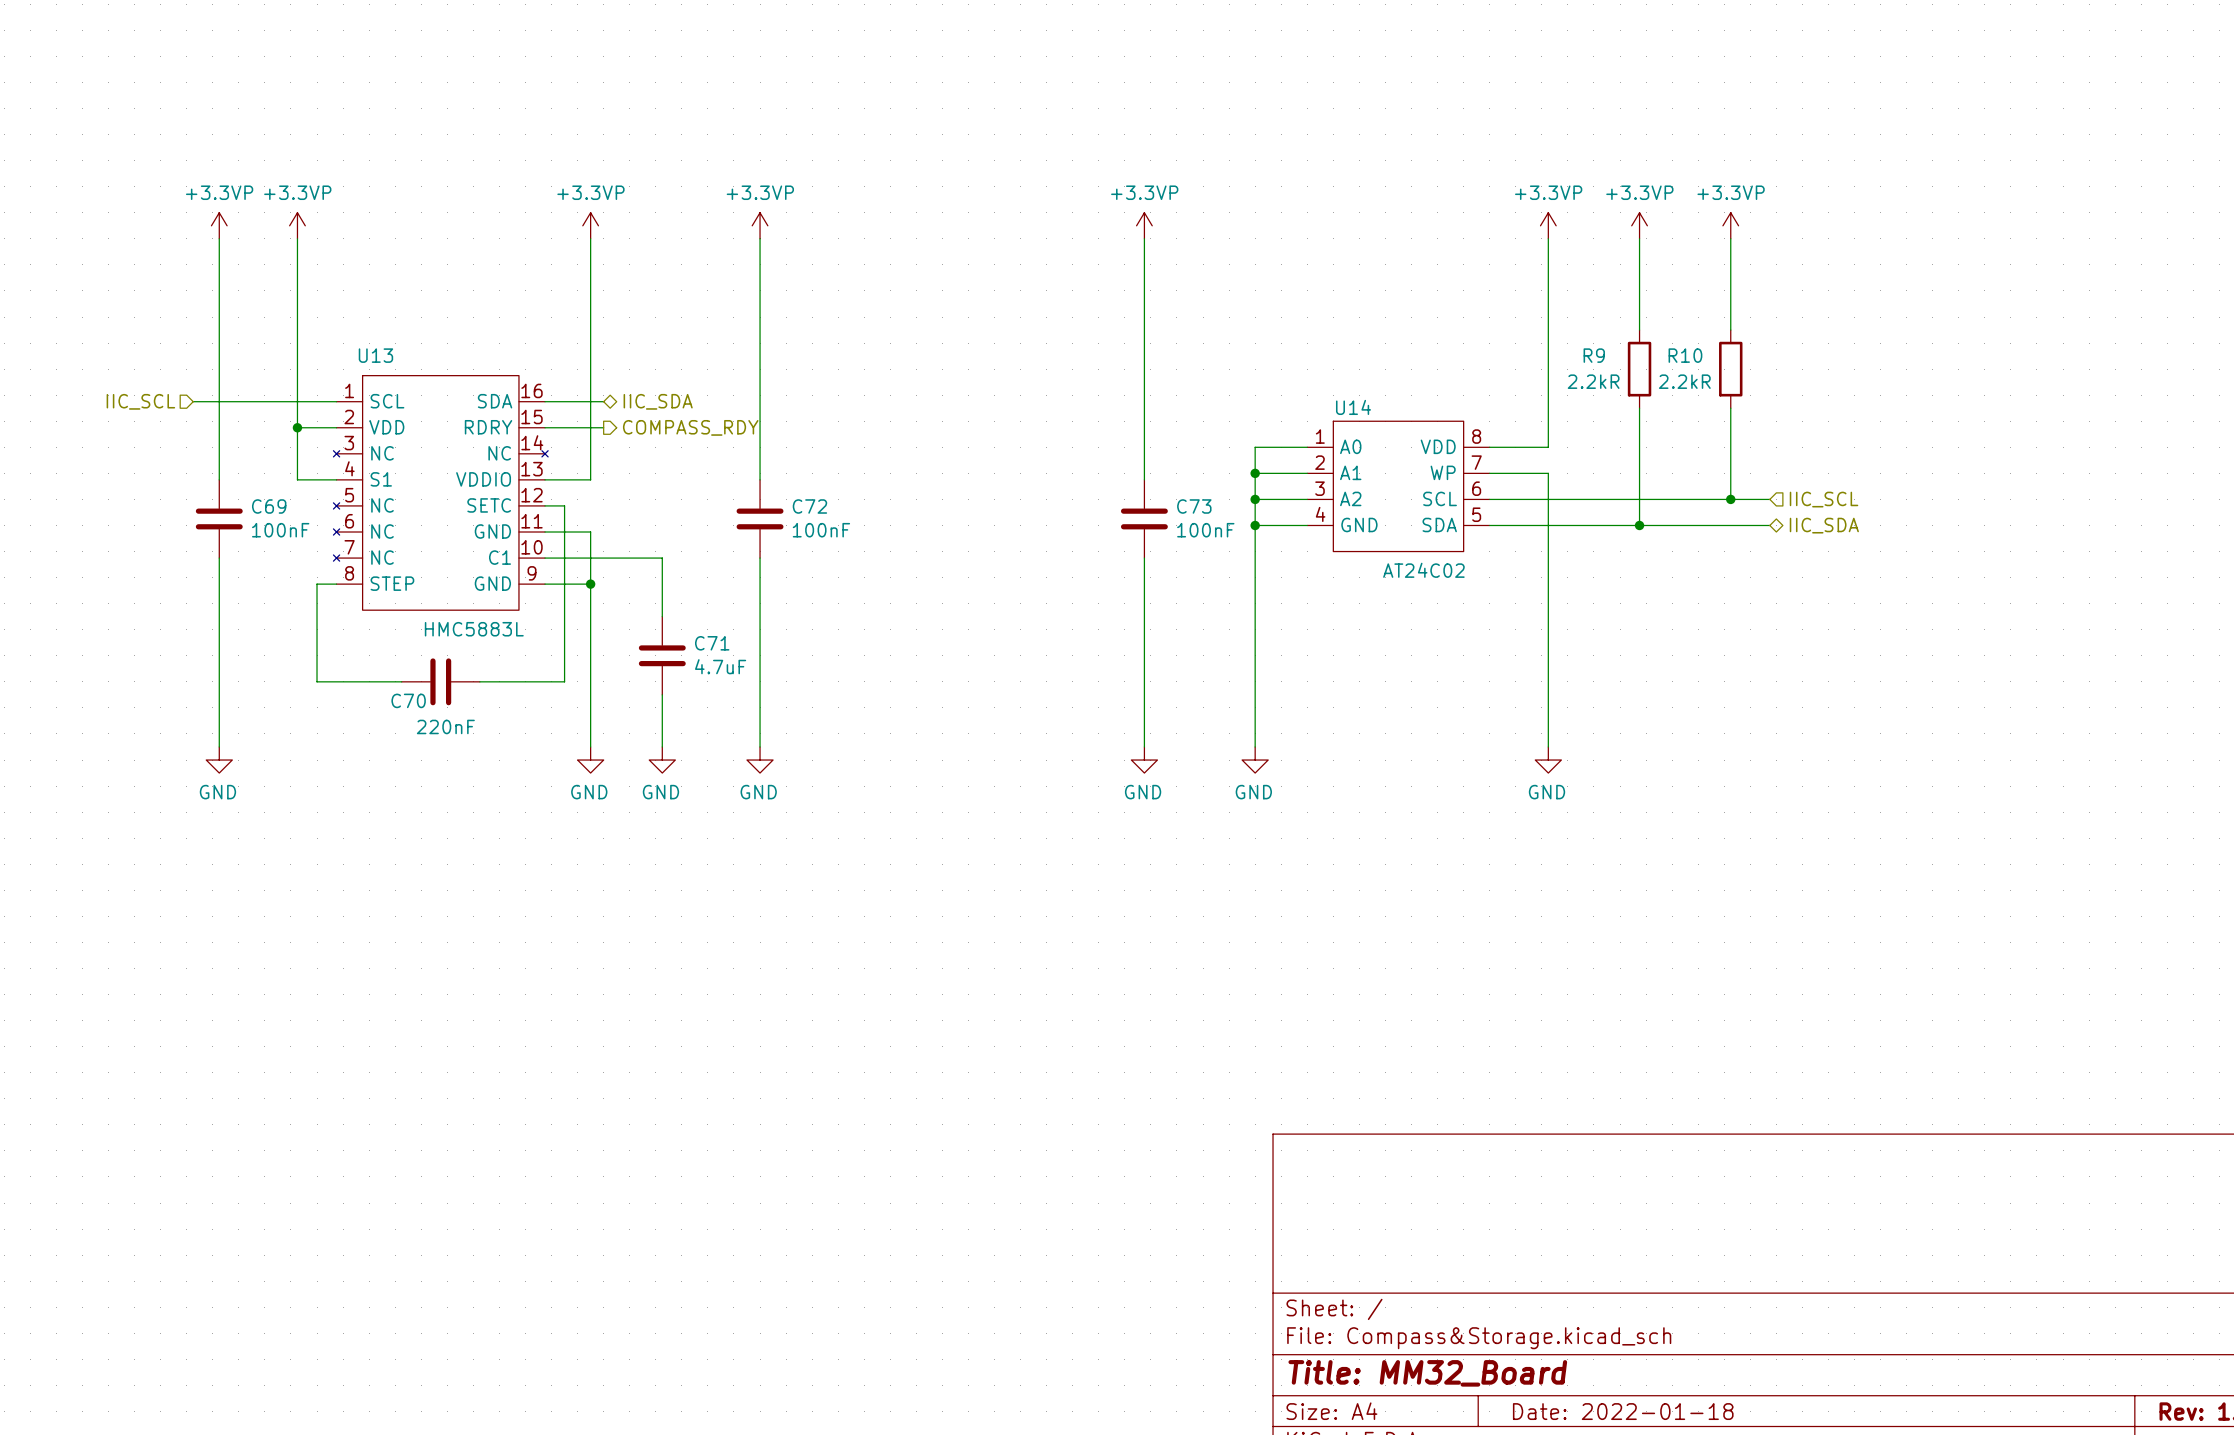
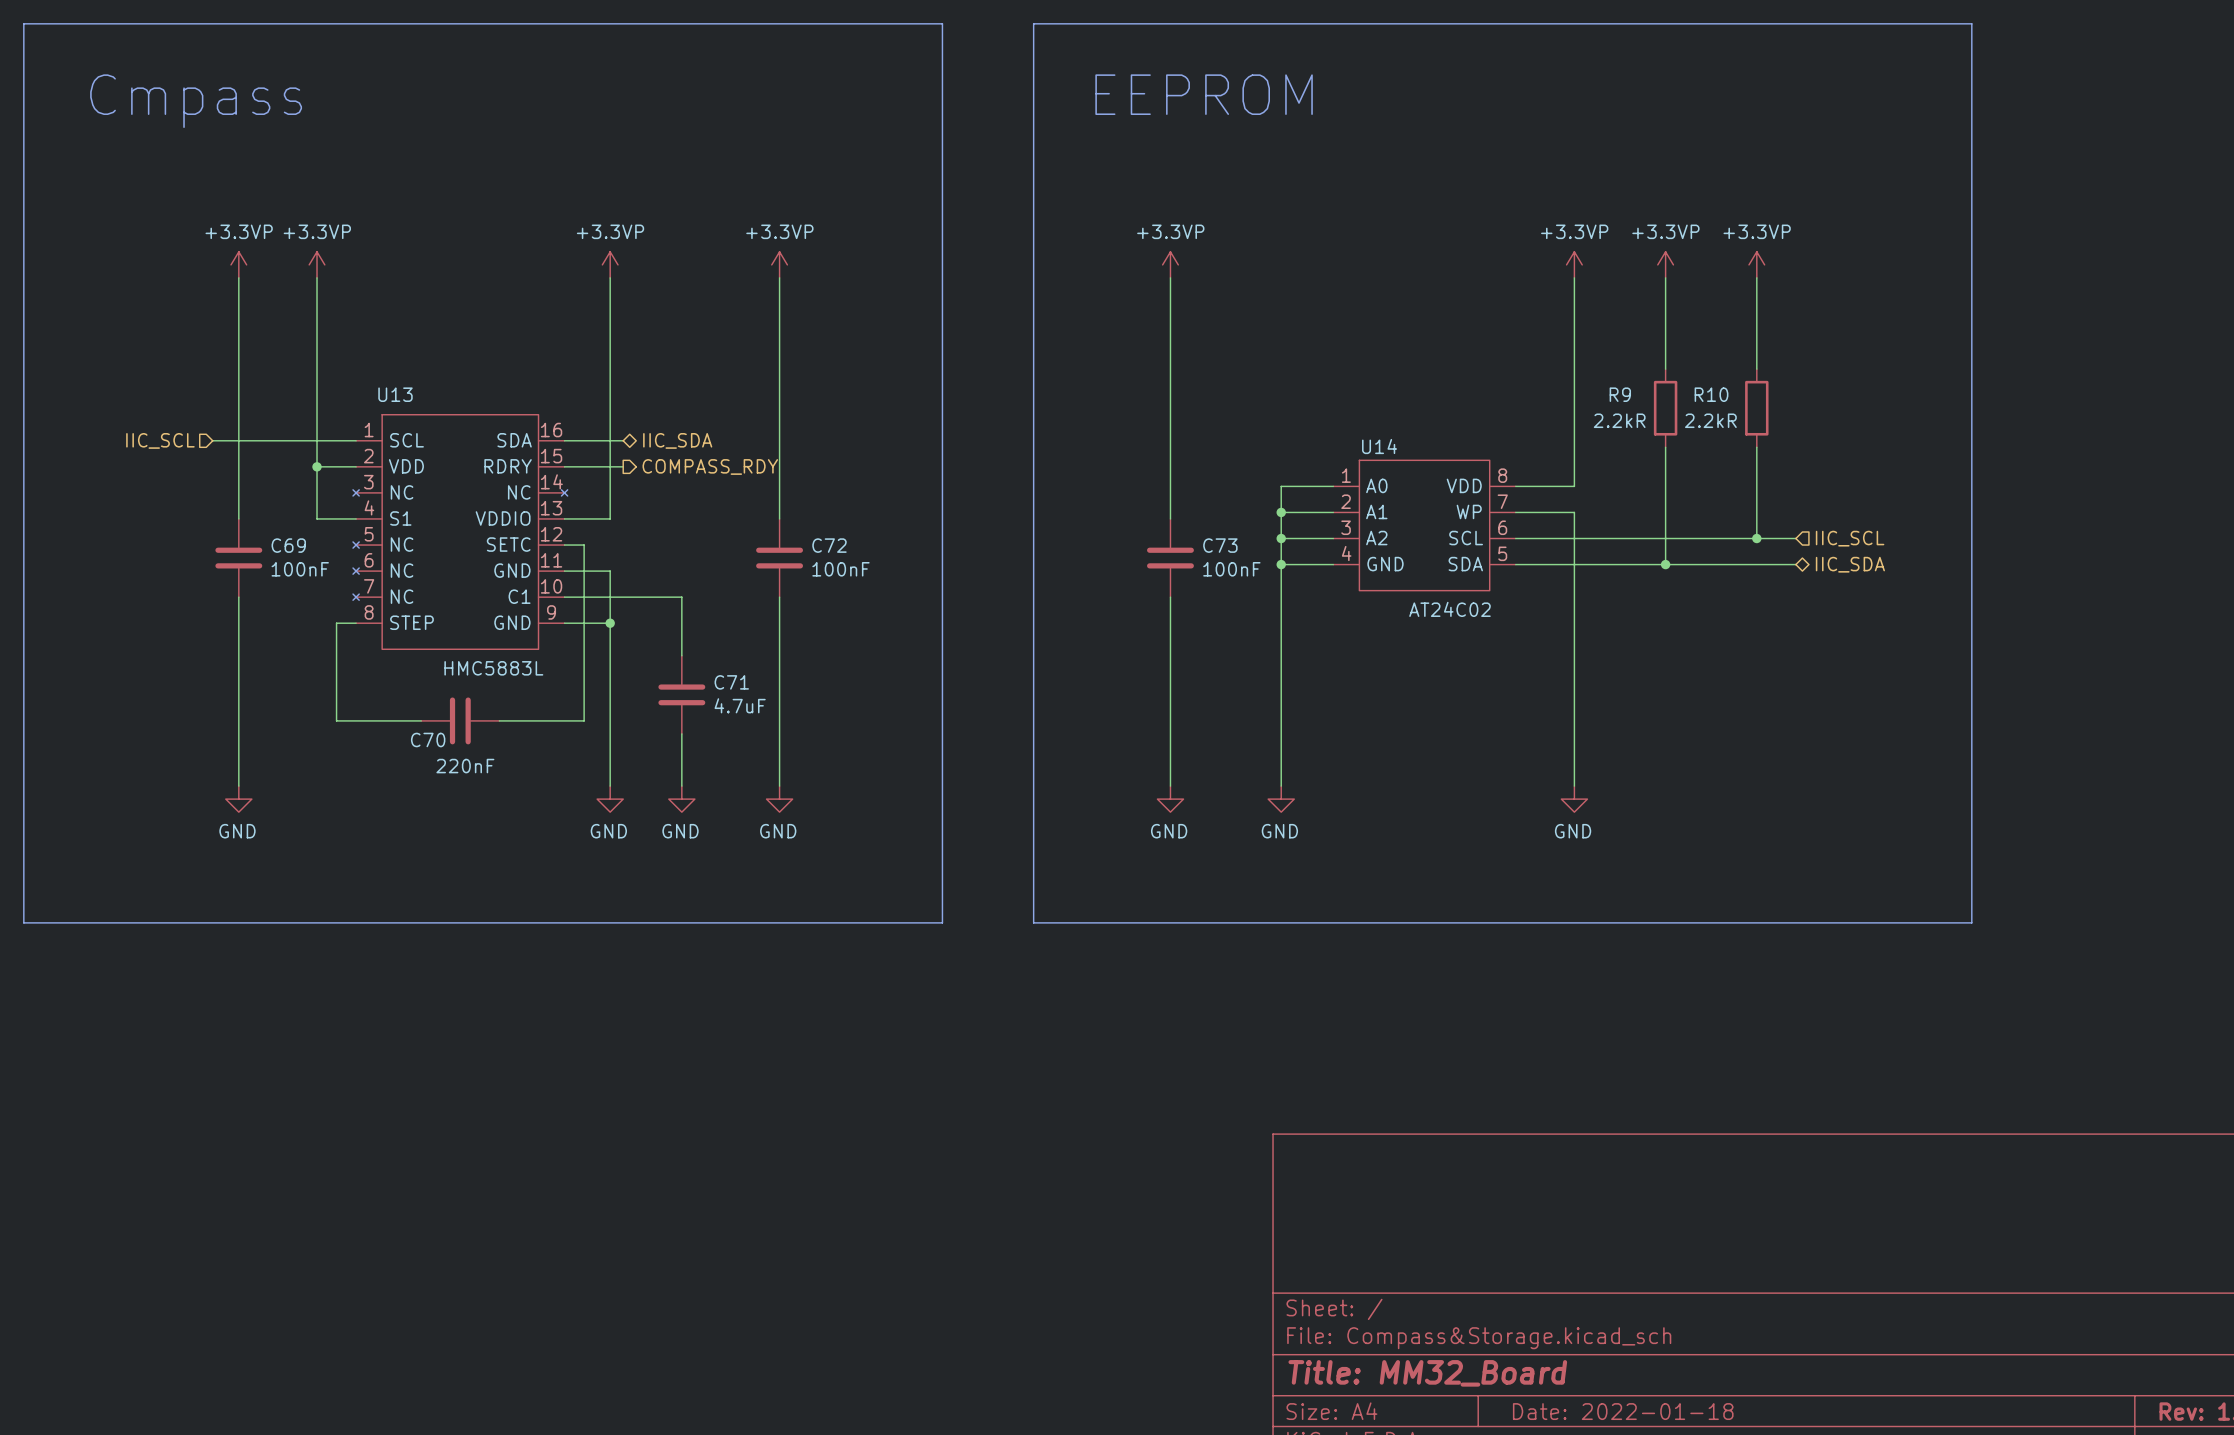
line: none -> (23, 23) (942, 23) (942, 922) (23, 922) (23, 23)
line: none -> (1033, 23) (1033, 922) (1971, 922) (1971, 23) (1033, 23)
text: none -> EEPROM (1204, 94)
text: none -> Cmpass (196, 101)
power symbol: +3.3VP (219, 225) -> none
power symbol: +3.3VP (297, 225) -> none
power symbol position: +3.3VP (590, 225) -> +3.3VP (610, 264)
power symbol position: +3.3VP (760, 225) -> +3.3VP (779, 264)
power symbol position: +3.3VP (1144, 225) -> +3.3VP (1170, 264)
power symbol: +3.3VP (1548, 225) -> none
power symbol: +3.3VP (1639, 225) -> none
power symbol: +3.3VP (1730, 225) -> none
wire: (219, 238) (219, 479) -> (238, 277) (238, 518)
wire: (297, 238) (297, 479) (336, 479) -> (317, 277) (317, 518) (356, 518)
wire: (590, 238) (590, 479) (545, 479) -> (610, 277) (610, 518) (564, 518)
wire: (760, 238) (760, 479) -> (779, 277) (779, 518)
wire: (1144, 238) (1144, 479) -> (1170, 277) (1170, 518)
wire: (1548, 238) (1548, 447) (1489, 447) -> (1574, 277) (1574, 486) (1515, 486)
wire: (1639, 238) (1639, 330) -> (1665, 277) (1665, 369)
wire: (1730, 238) (1730, 330) -> (1756, 277) (1756, 369)
power symbol: none -> +3.3VP (238, 264)
power symbol: none -> +3.3VP (317, 264)
power symbol: none -> +3.3VP (1574, 264)
power symbol: none -> +3.3VP (1665, 264)
power symbol: none -> +3.3VP (1756, 264)
R9 position: (1639, 369) -> (1665, 408)
R10 position: (1730, 369) -> (1756, 408)
hierarchical label position: IIC_SCL (140, 401) -> IIC_SCL (160, 440)
wire: (193, 401) (336, 401) -> (212, 440) (356, 440)
wire: (545, 401) (603, 401) -> (564, 440) (623, 440)
hierarchical label position: IIC_SDA (658, 401) -> IIC_SDA (677, 440)
wire: (1639, 408) (1639, 525) -> (1665, 447) (1665, 564)
wire: (1730, 408) (1730, 499) -> (1756, 447) (1756, 538)
wire: (297, 427) (336, 427) -> (317, 466) (356, 466)
junction position: (297, 427) -> (317, 466)
wire: (545, 427) (603, 427) -> (564, 466) (623, 466)
hierarchical label position: COMPASS_RDY (690, 427) -> COMPASS_RDY (710, 466)
wire: (1307, 447) (1255, 447) (1255, 746) -> (1333, 486) (1281, 486) (1281, 786)
wire: (1255, 473) (1307, 473) -> (1281, 512) (1333, 512)
junction: (1255, 473) -> none
wire: (1489, 473) (1548, 473) (1548, 746) -> (1515, 512) (1574, 512) (1574, 786)
U14 position: (1398, 486) -> (1424, 525)
U13 position: (440, 492) -> (460, 532)
wire: (1255, 499) (1307, 499) -> (1281, 538) (1333, 538)
junction: (1255, 499) -> none
wire: (1489, 499) (1769, 499) -> (1515, 538) (1795, 538)
junction: (1730, 499) -> none
hierarchical label position: IIC_SCL (1824, 499) -> IIC_SCL (1850, 538)
wire: (545, 505) (564, 505) (564, 681) (479, 681) -> (564, 545) (584, 545) (584, 720) (499, 720)
junction: none -> (1281, 512)
C69 position: (219, 518) -> (238, 558)
C72 position: (760, 518) -> (779, 558)
C73 position: (1144, 518) -> (1170, 558)
wire: (1255, 525) (1307, 525) -> (1281, 564) (1333, 564)
junction: (1255, 525) -> none
wire: (1489, 525) (1769, 525) -> (1515, 564) (1795, 564)
junction: (1639, 525) -> none
hierarchical label position: IIC_SDA (1824, 525) -> IIC_SDA (1850, 564)
wire: (545, 532) (590, 532) (590, 746) -> (564, 571) (610, 571) (610, 786)
junction: none -> (1281, 538)
junction: none -> (1756, 538)
wire: (219, 558) (219, 746) -> (238, 597) (238, 786)
wire: (545, 558) (662, 558) (662, 616) -> (564, 597) (681, 597) (681, 655)
wire: (760, 558) (760, 746) -> (779, 597) (779, 786)
wire: (1144, 558) (1144, 746) -> (1170, 597) (1170, 786)
junction: none -> (1281, 564)
junction: none -> (1665, 564)
wire: (336, 584) (317, 584) (317, 681) (401, 681) -> (356, 623) (336, 623) (336, 720) (421, 720)
wire: (545, 584) (590, 584) -> (564, 623) (610, 623)
junction position: (590, 584) -> (610, 623)
C71 position: (662, 655) -> (681, 694)
C70 position: (440, 681) -> (460, 720)
wire: (662, 694) (662, 746) -> (681, 733) (681, 786)
power symbol position: GND (219, 760) -> GND (238, 799)
power symbol: GND (590, 760) -> none
power symbol: GND (662, 760) -> none
power symbol: GND (760, 760) -> none
power symbol: GND (1144, 760) -> none
power symbol: GND (1255, 760) -> none
power symbol position: GND (1548, 760) -> GND (1574, 799)
power symbol: none -> GND (610, 799)
power symbol: none -> GND (681, 799)
power symbol: none -> GND (779, 799)
power symbol: none -> GND (1170, 799)
power symbol: none -> GND (1281, 799)

